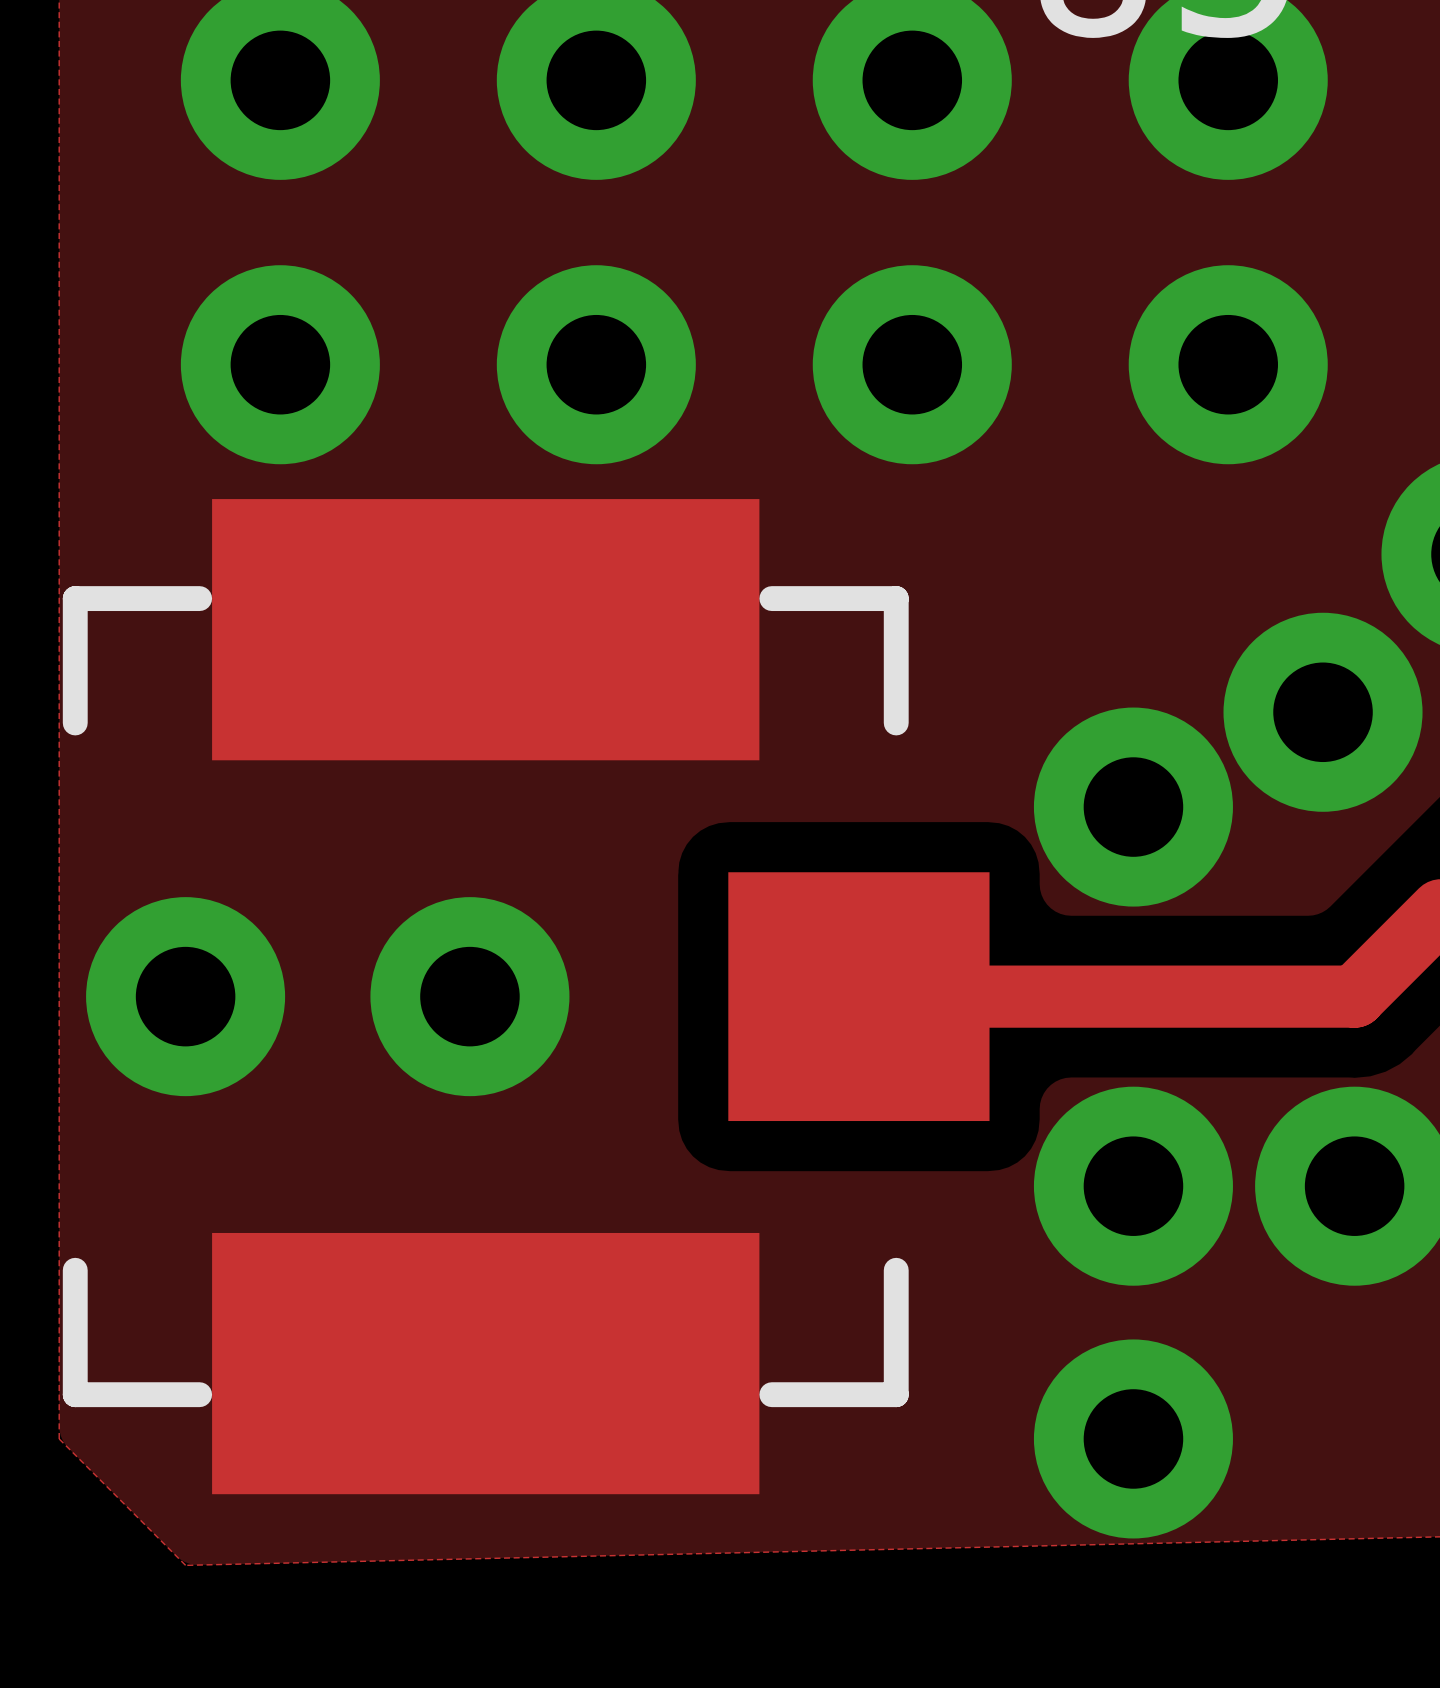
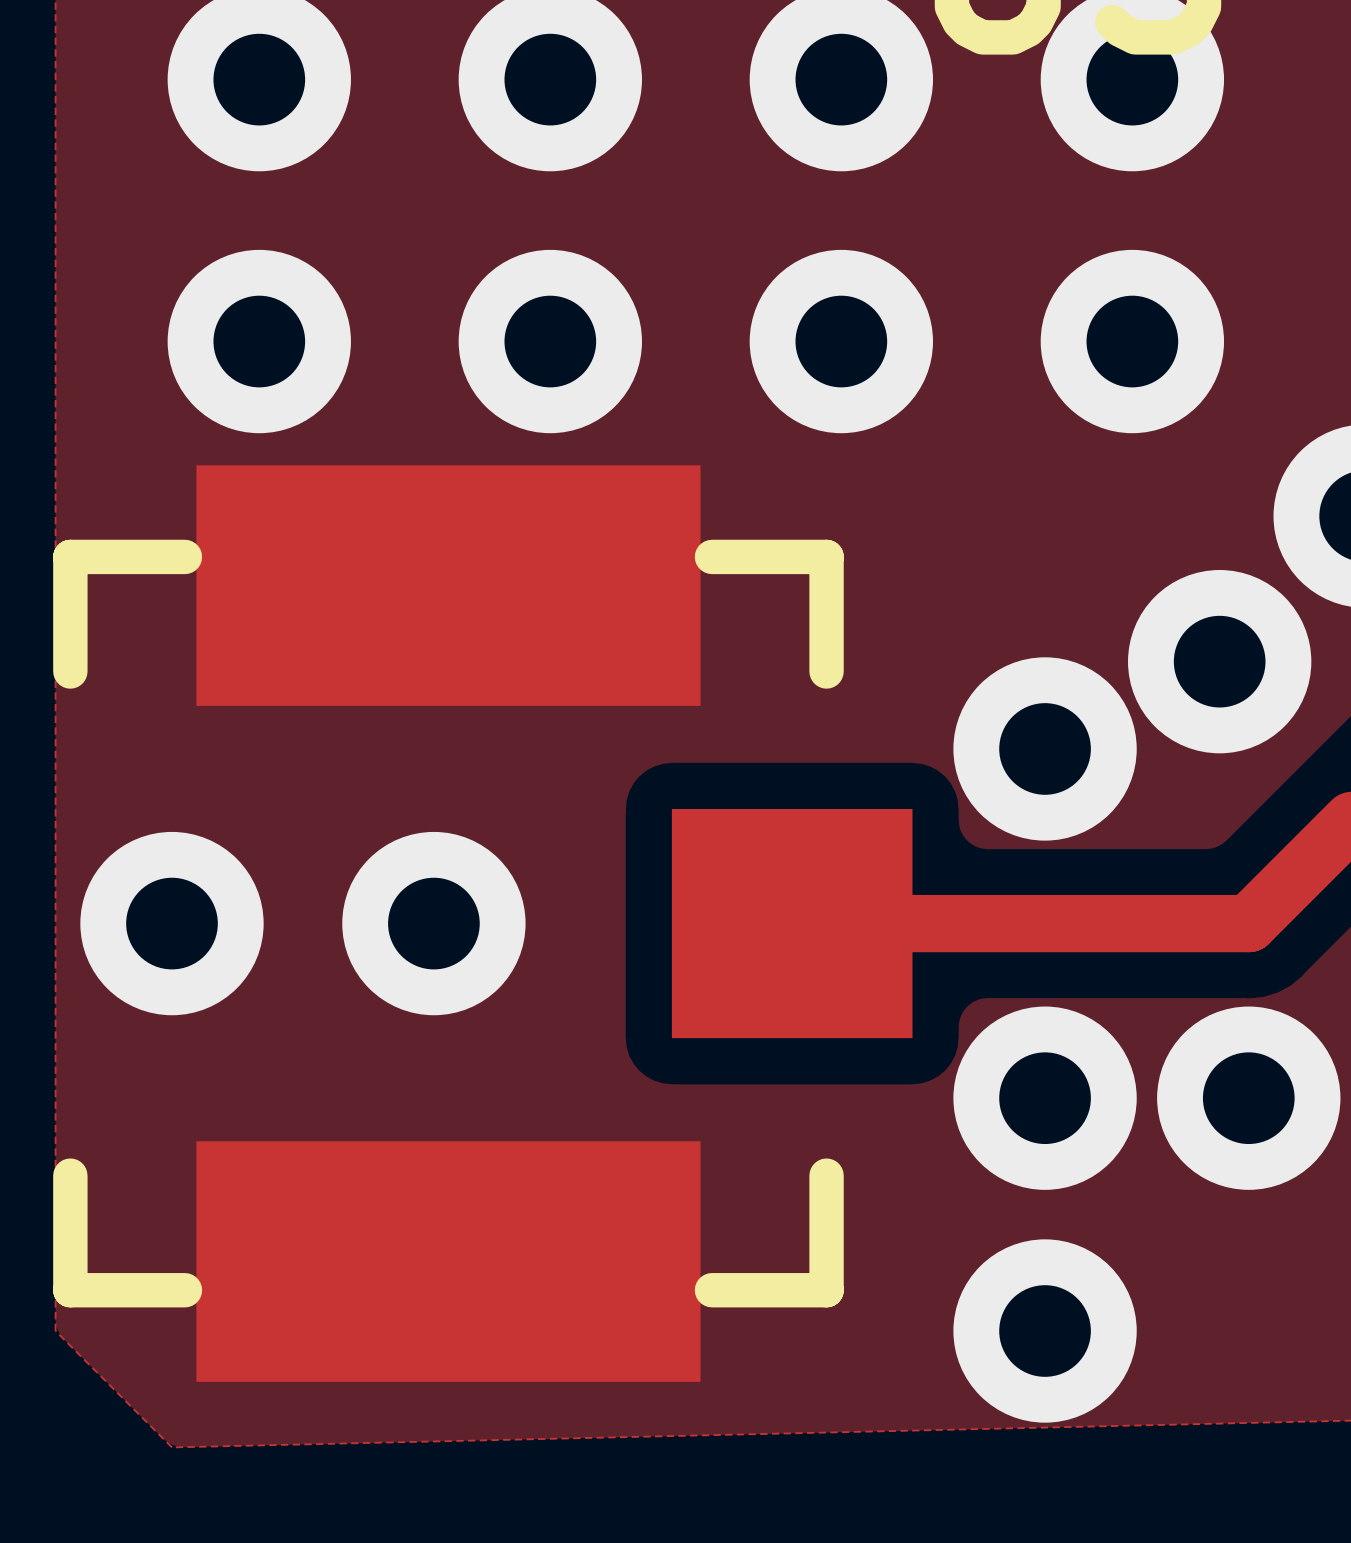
part footprint: [62, 499, 990, 1495] -> [53, 465, 913, 1382]

